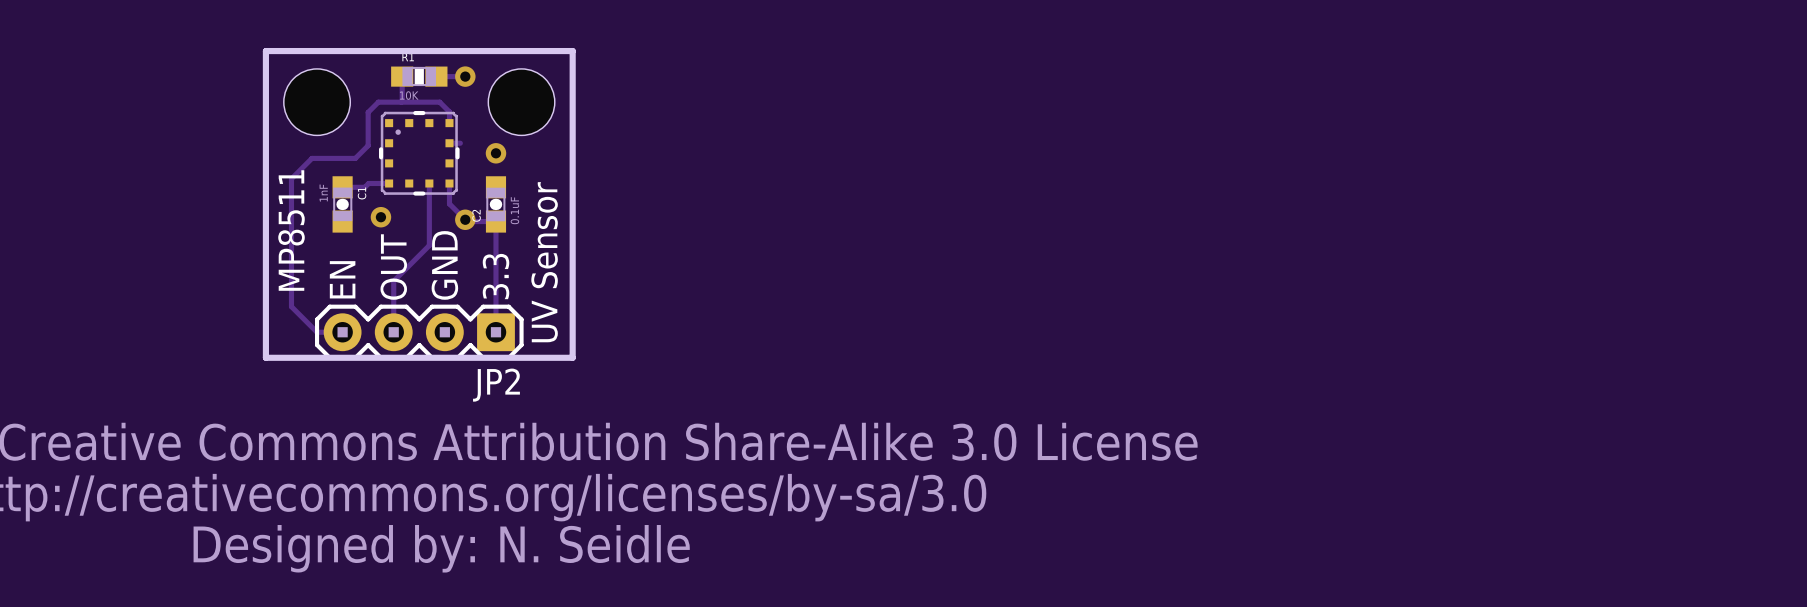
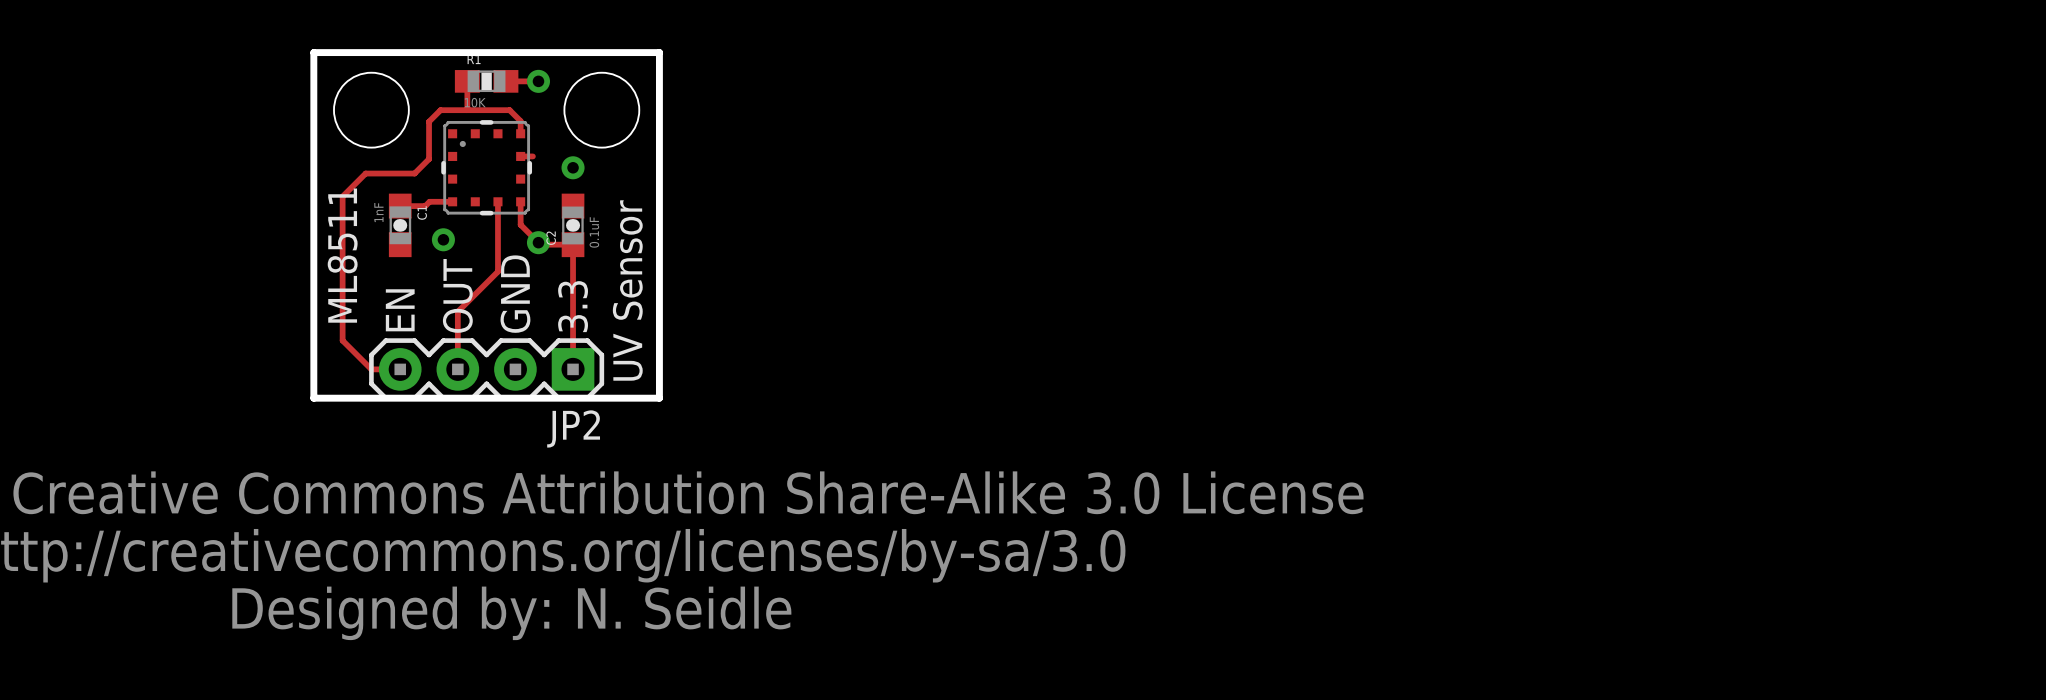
text: MP8511 (291, 230) -> ML8511 (342, 255)

